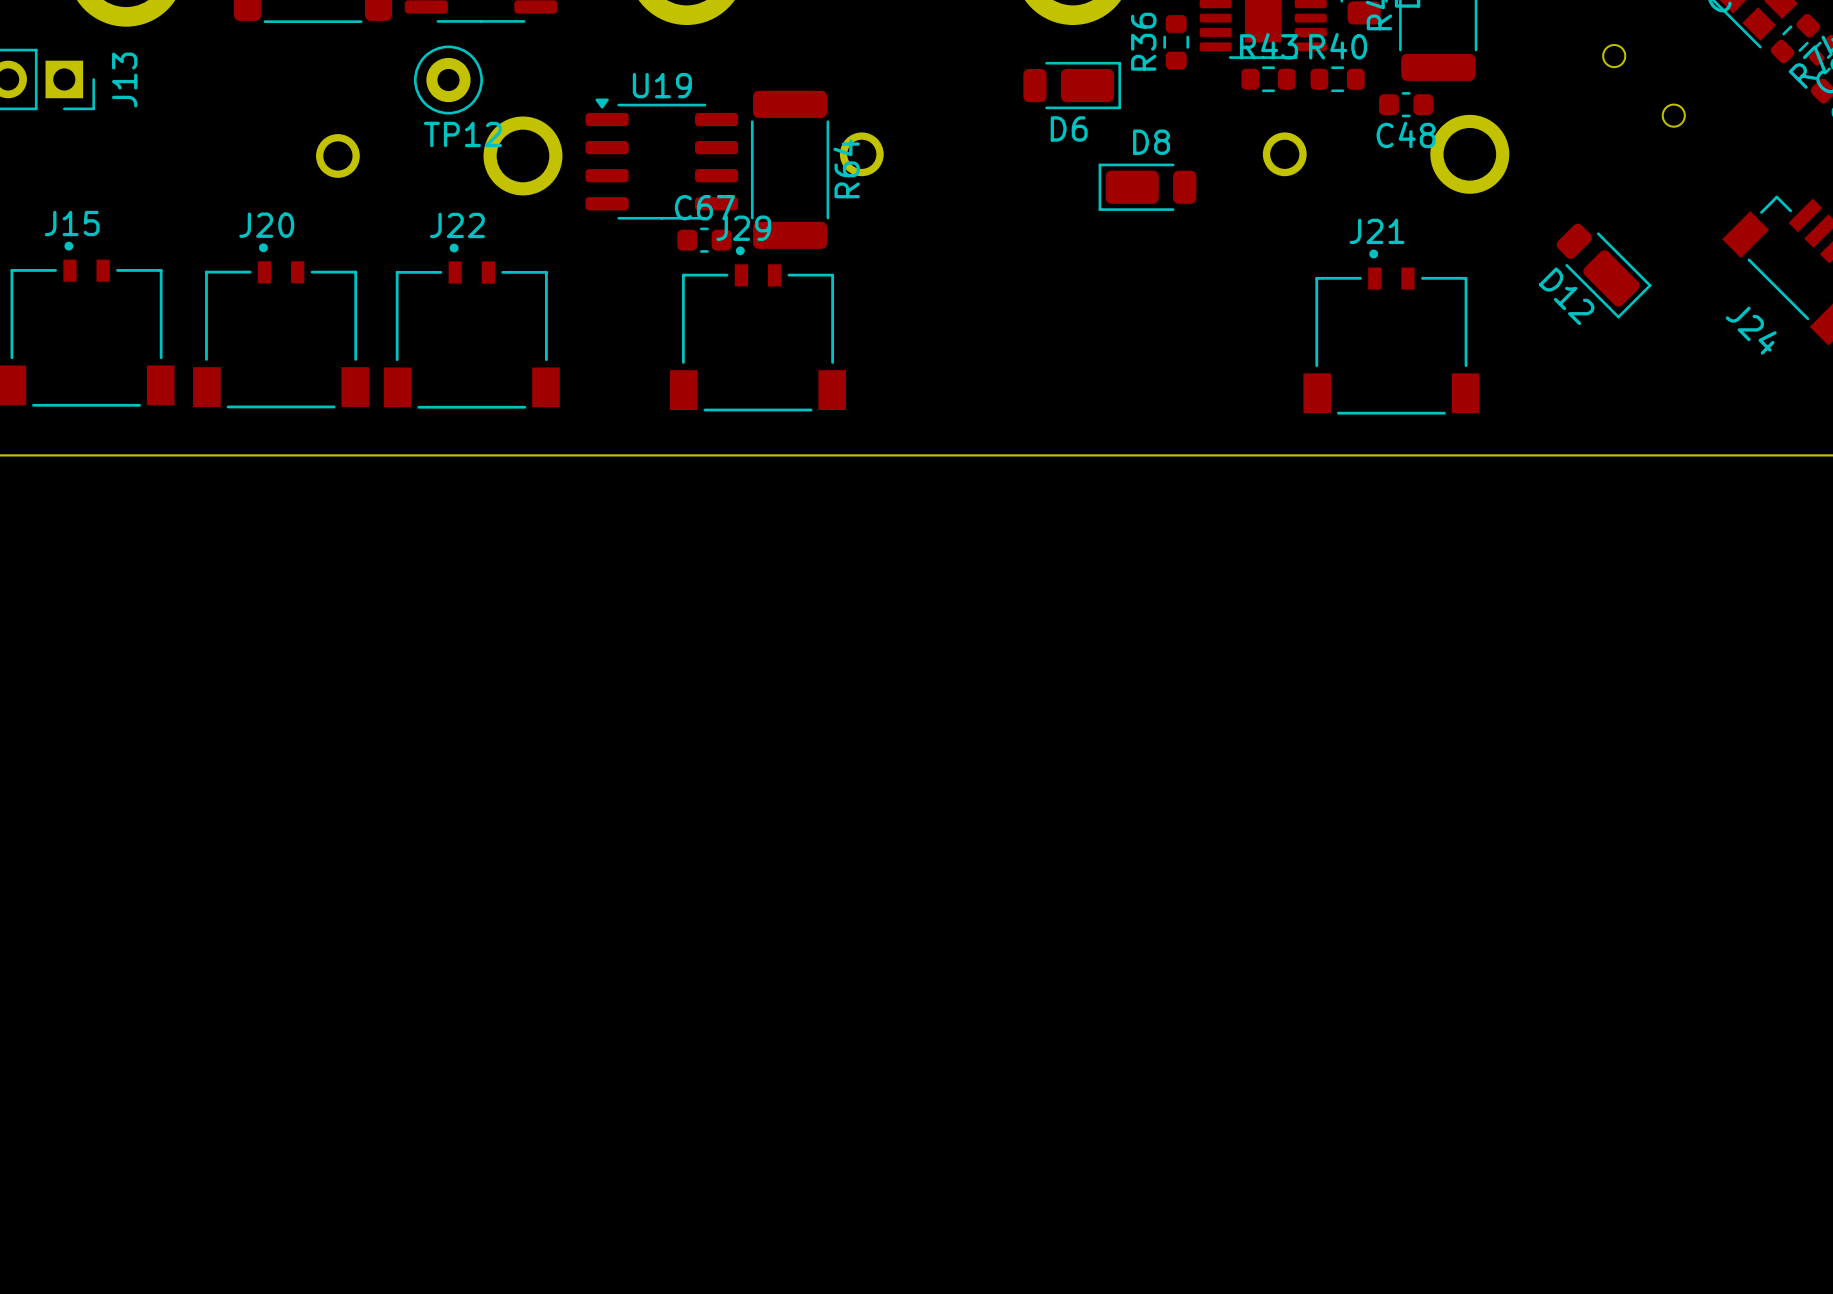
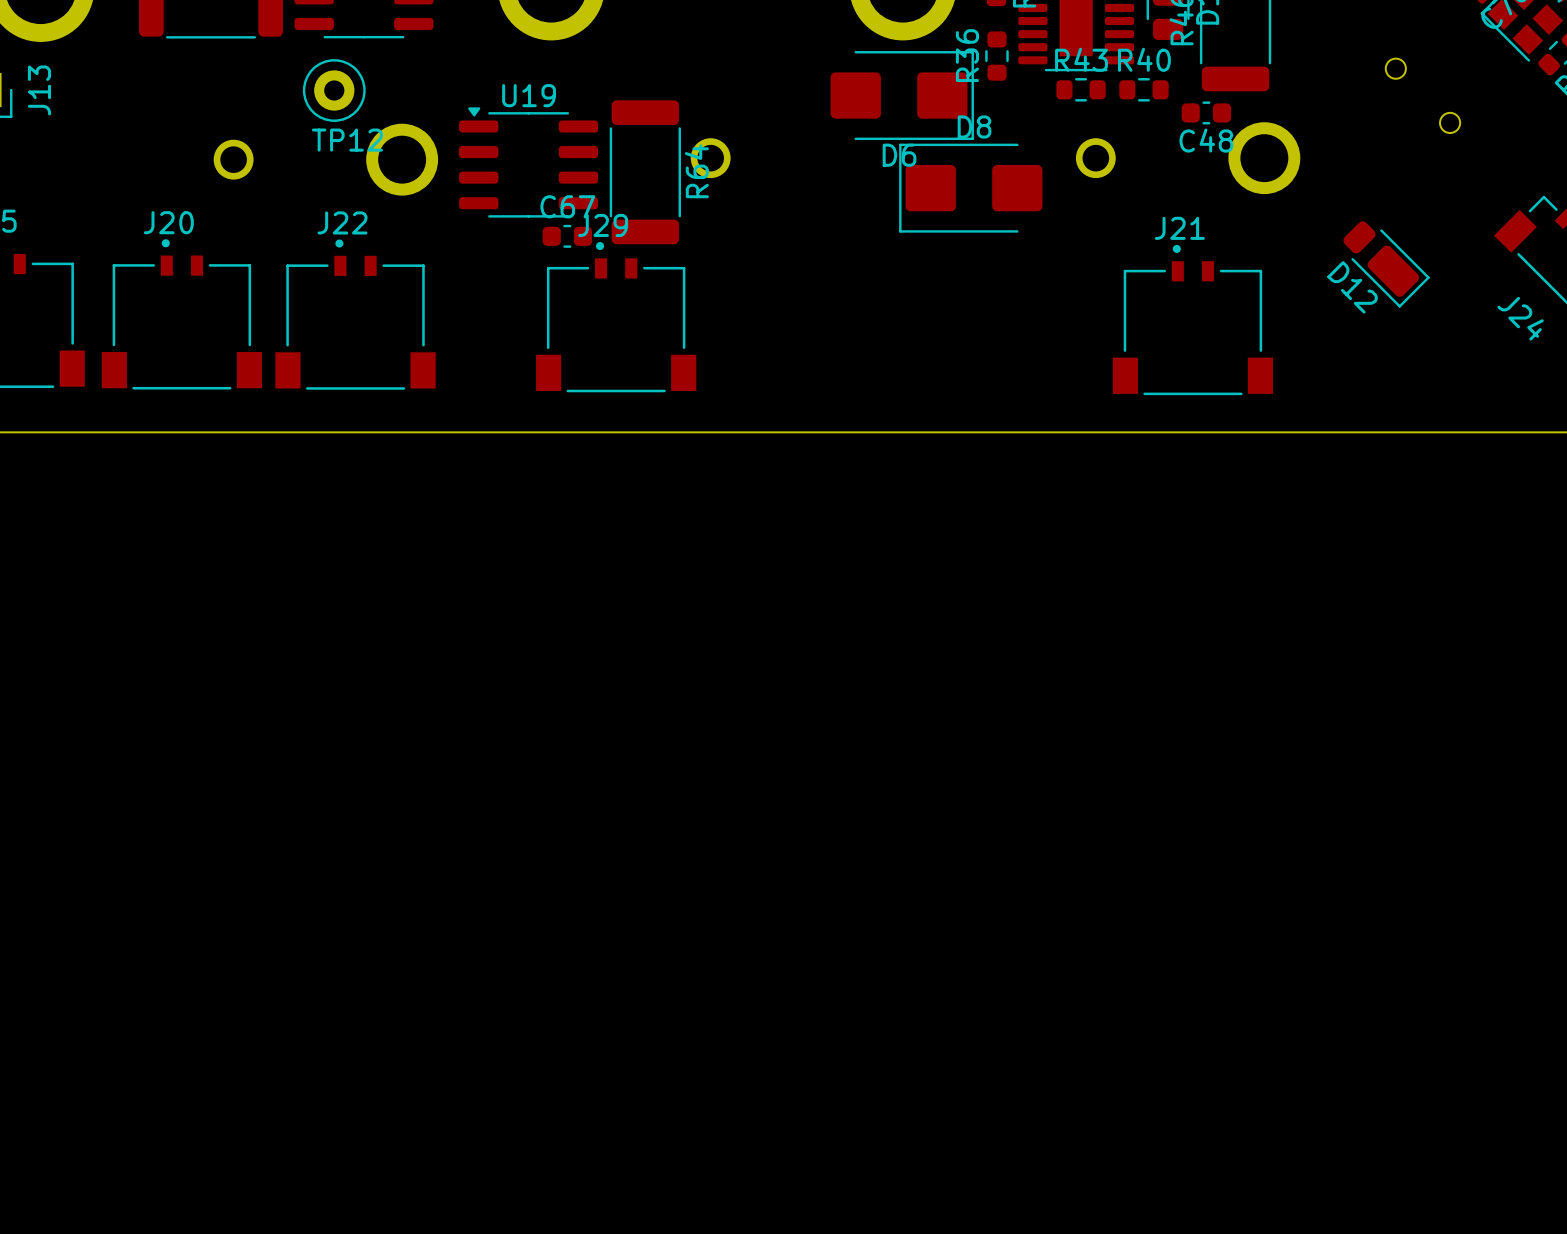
D6 footprint: [1023, 61, 1122, 110] -> [830, 51, 974, 141]
D8 footprint: [1098, 163, 1197, 211] -> [899, 143, 1043, 233]

